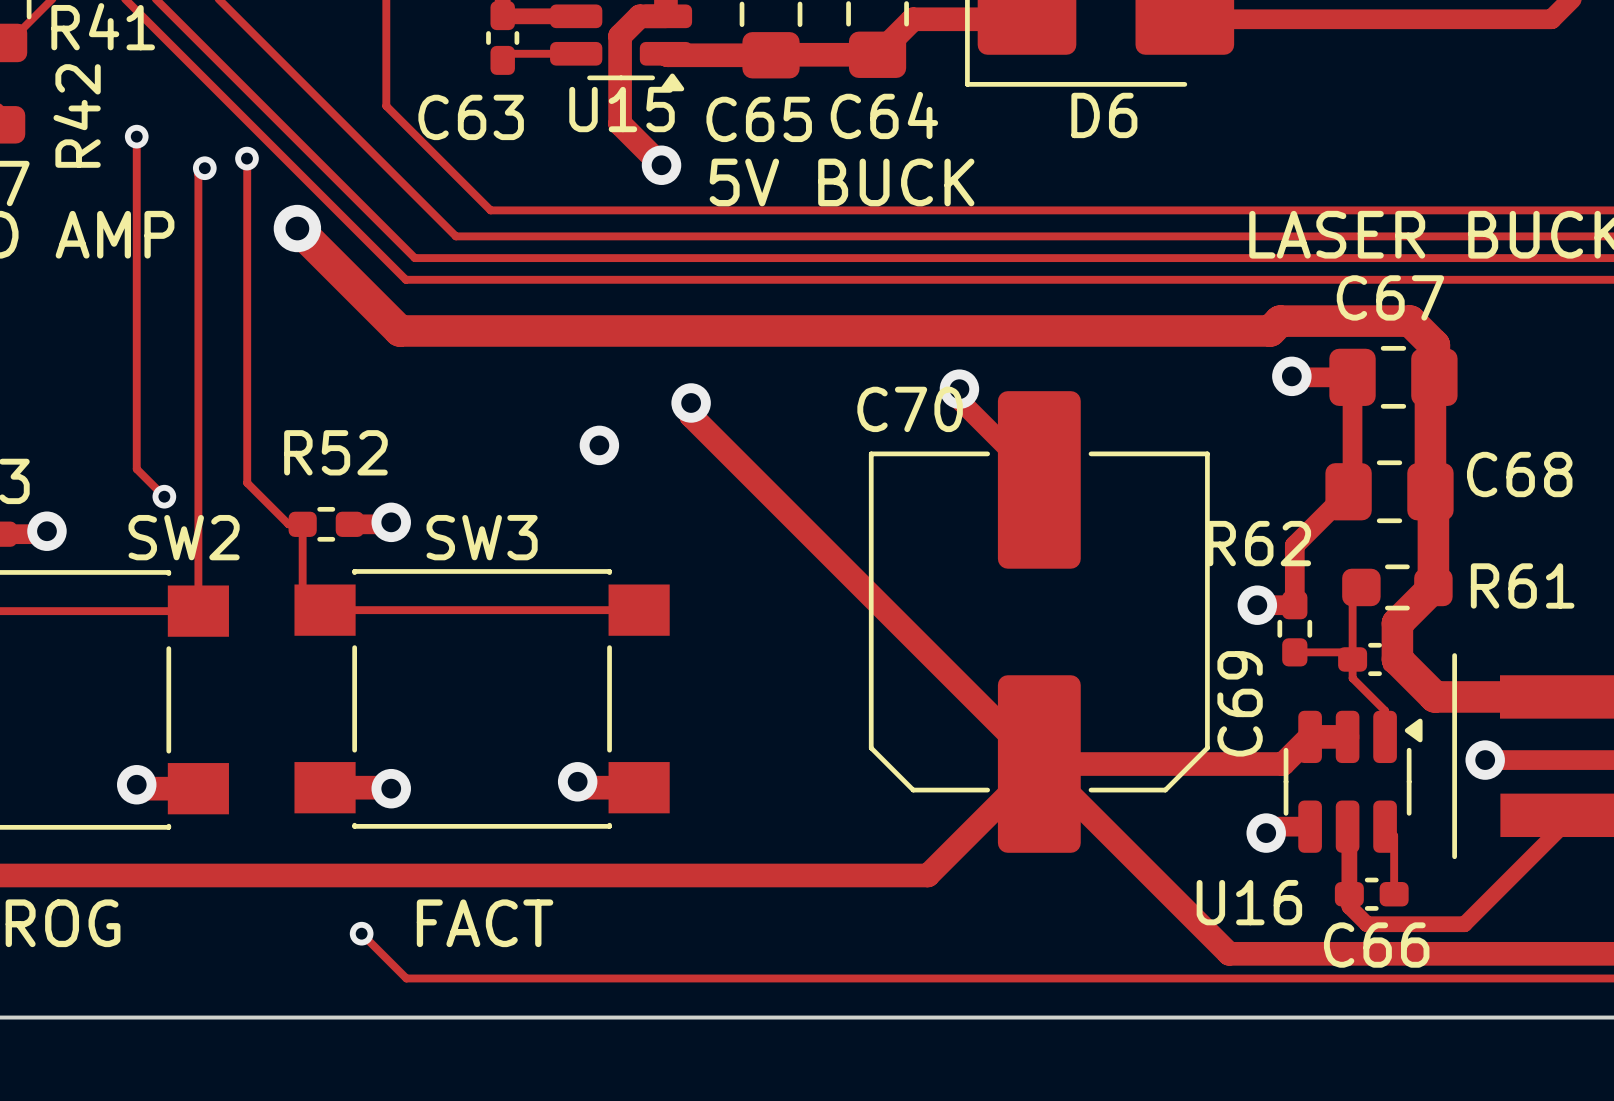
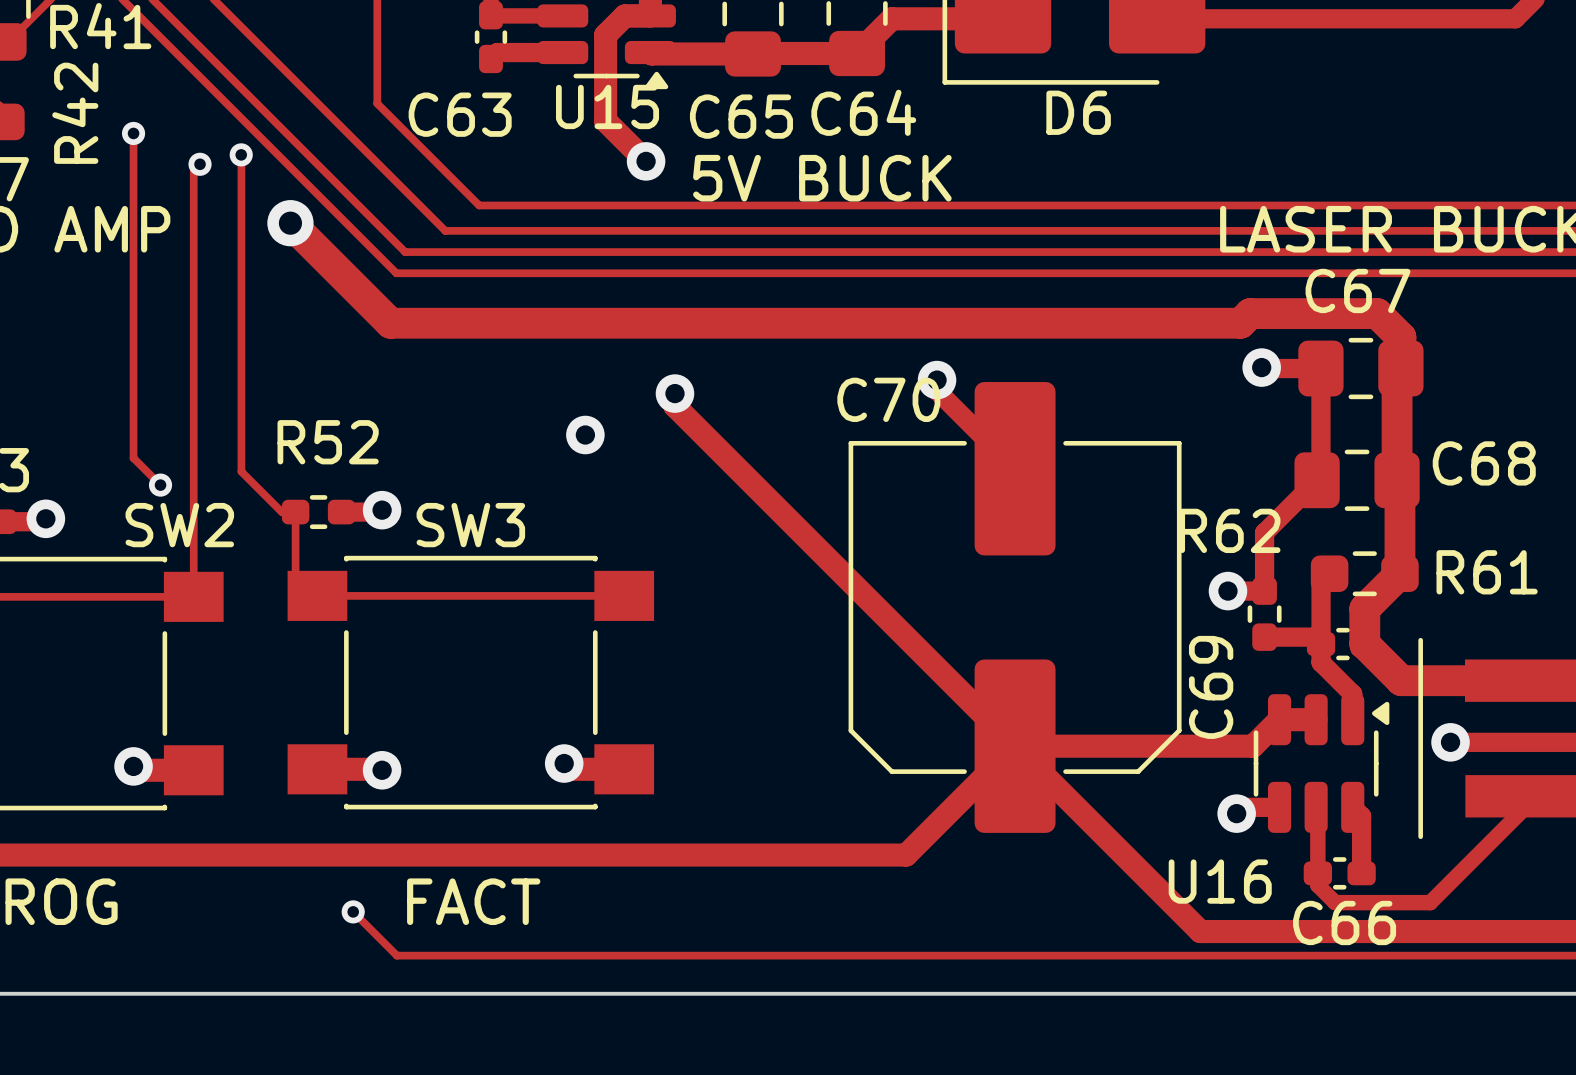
track width: thin (576, 53) (509, 53) (502, 60) -> thick (562, 52) (497, 52) (490, 58)
track width: thin (1361, 587) (1352, 596) (1352, 678) (1385, 710) (1385, 736) -> thick (1329, 573) (1321, 582) (1321, 662) (1352, 694) (1352, 719)
track width: thin (1294, 652) (1345, 652) (1352, 659) -> thick (1264, 637) (1314, 637) (1321, 644)
track width: thin (1385, 826) (1394, 835) (1394, 894) -> thick (1352, 807) (1361, 816) (1361, 873)

